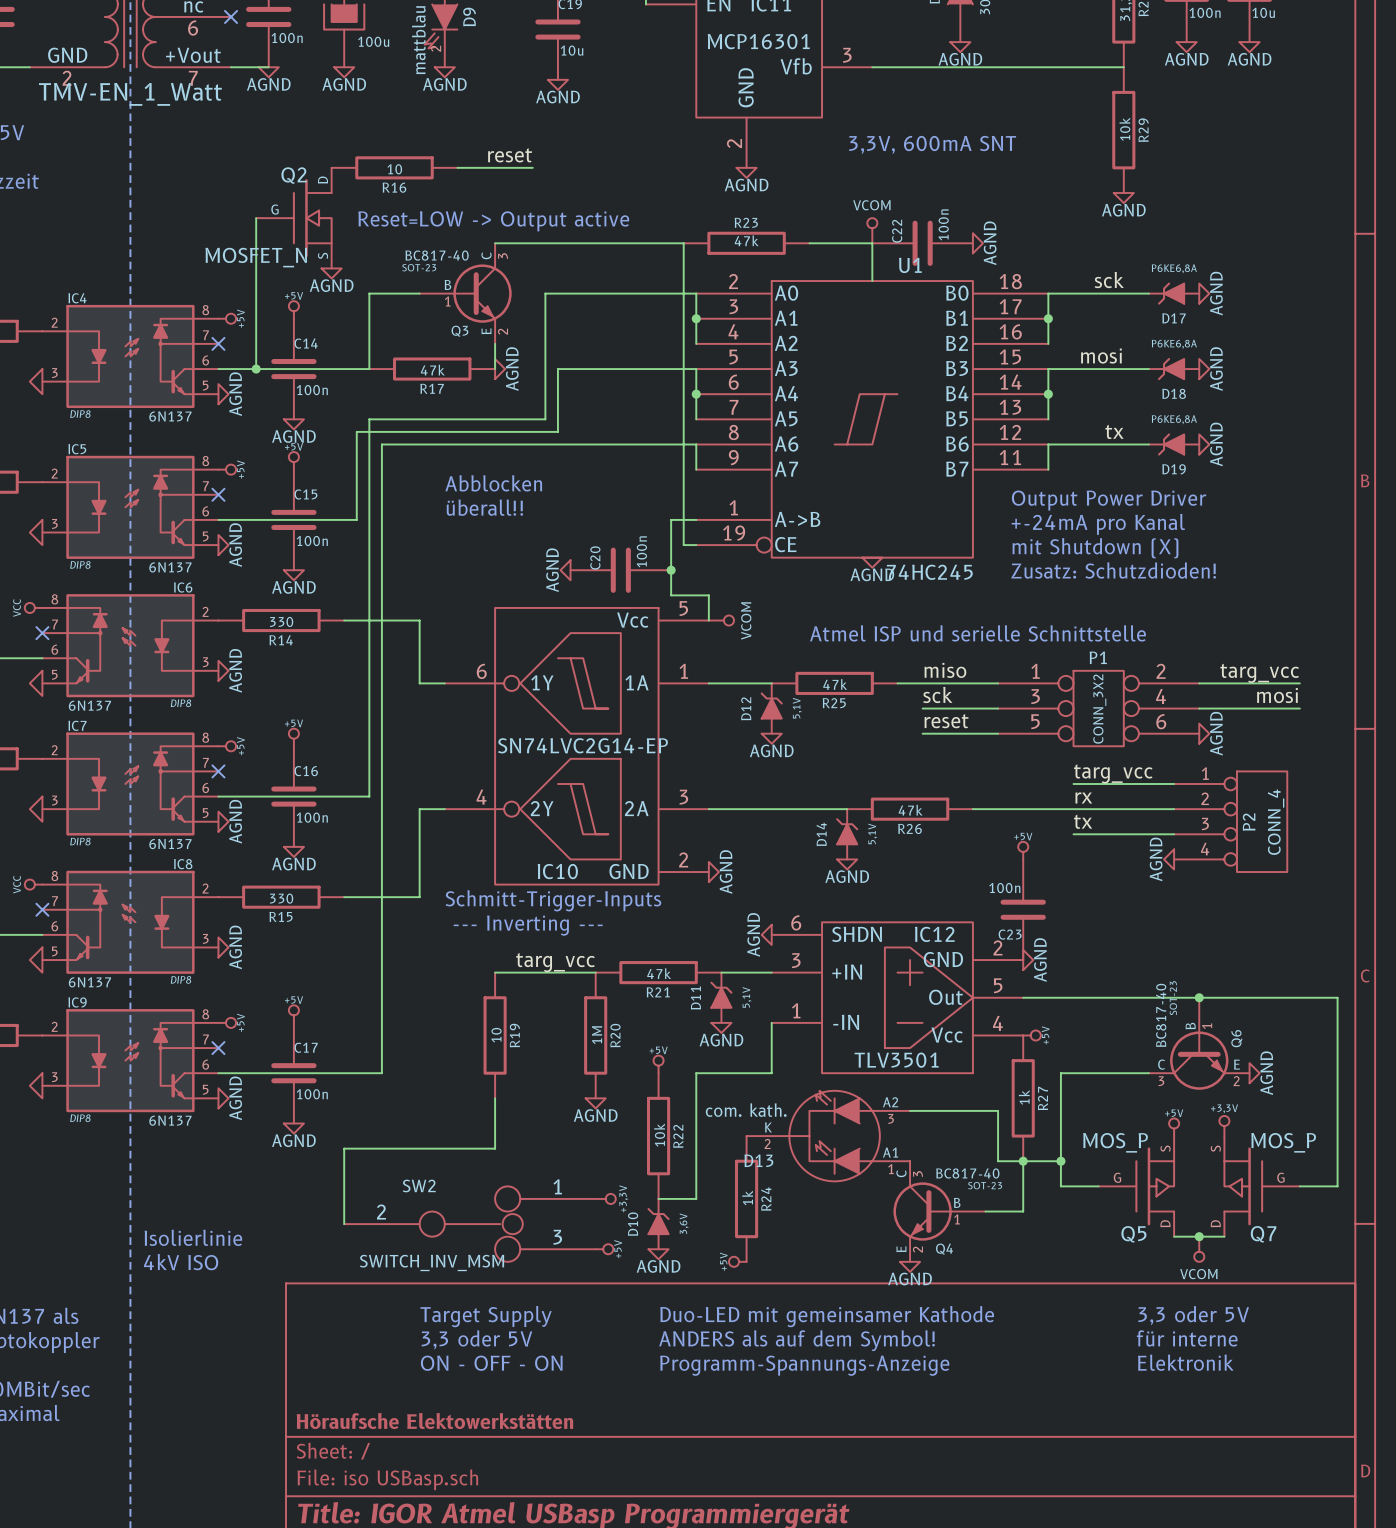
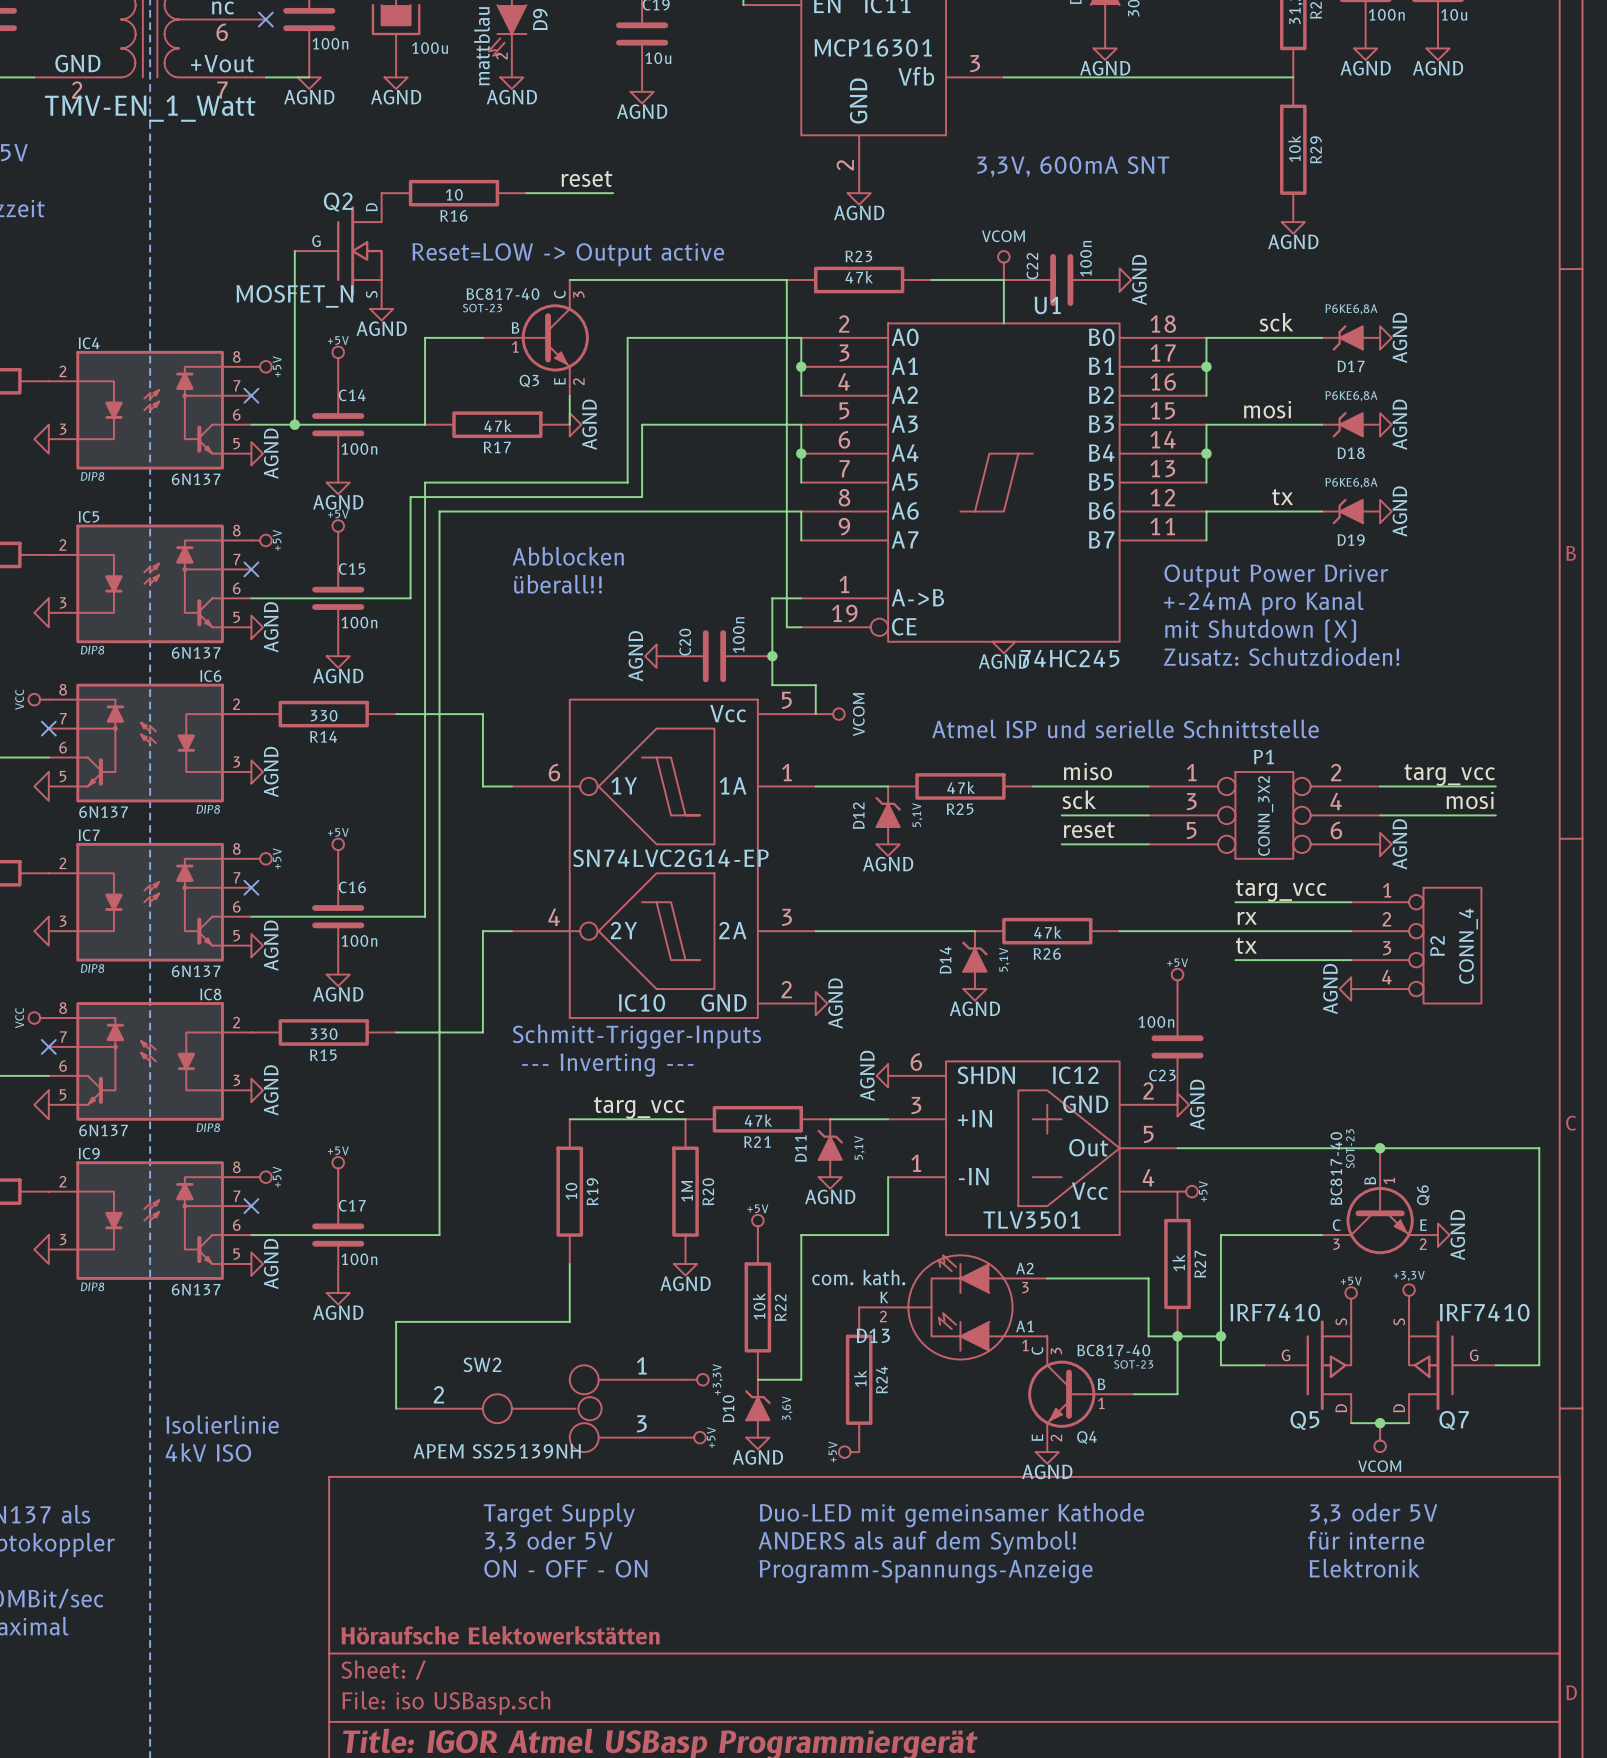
Q5 value: MOS_P (1115, 1142) -> IRF7410 (1275, 1312)
Q7 value: MOS_P (1283, 1142) -> IRF7410 (1484, 1312)
SW2 value: SWITCH_INV_MSM (432, 1262) -> APEM SS25139NH (497, 1451)

